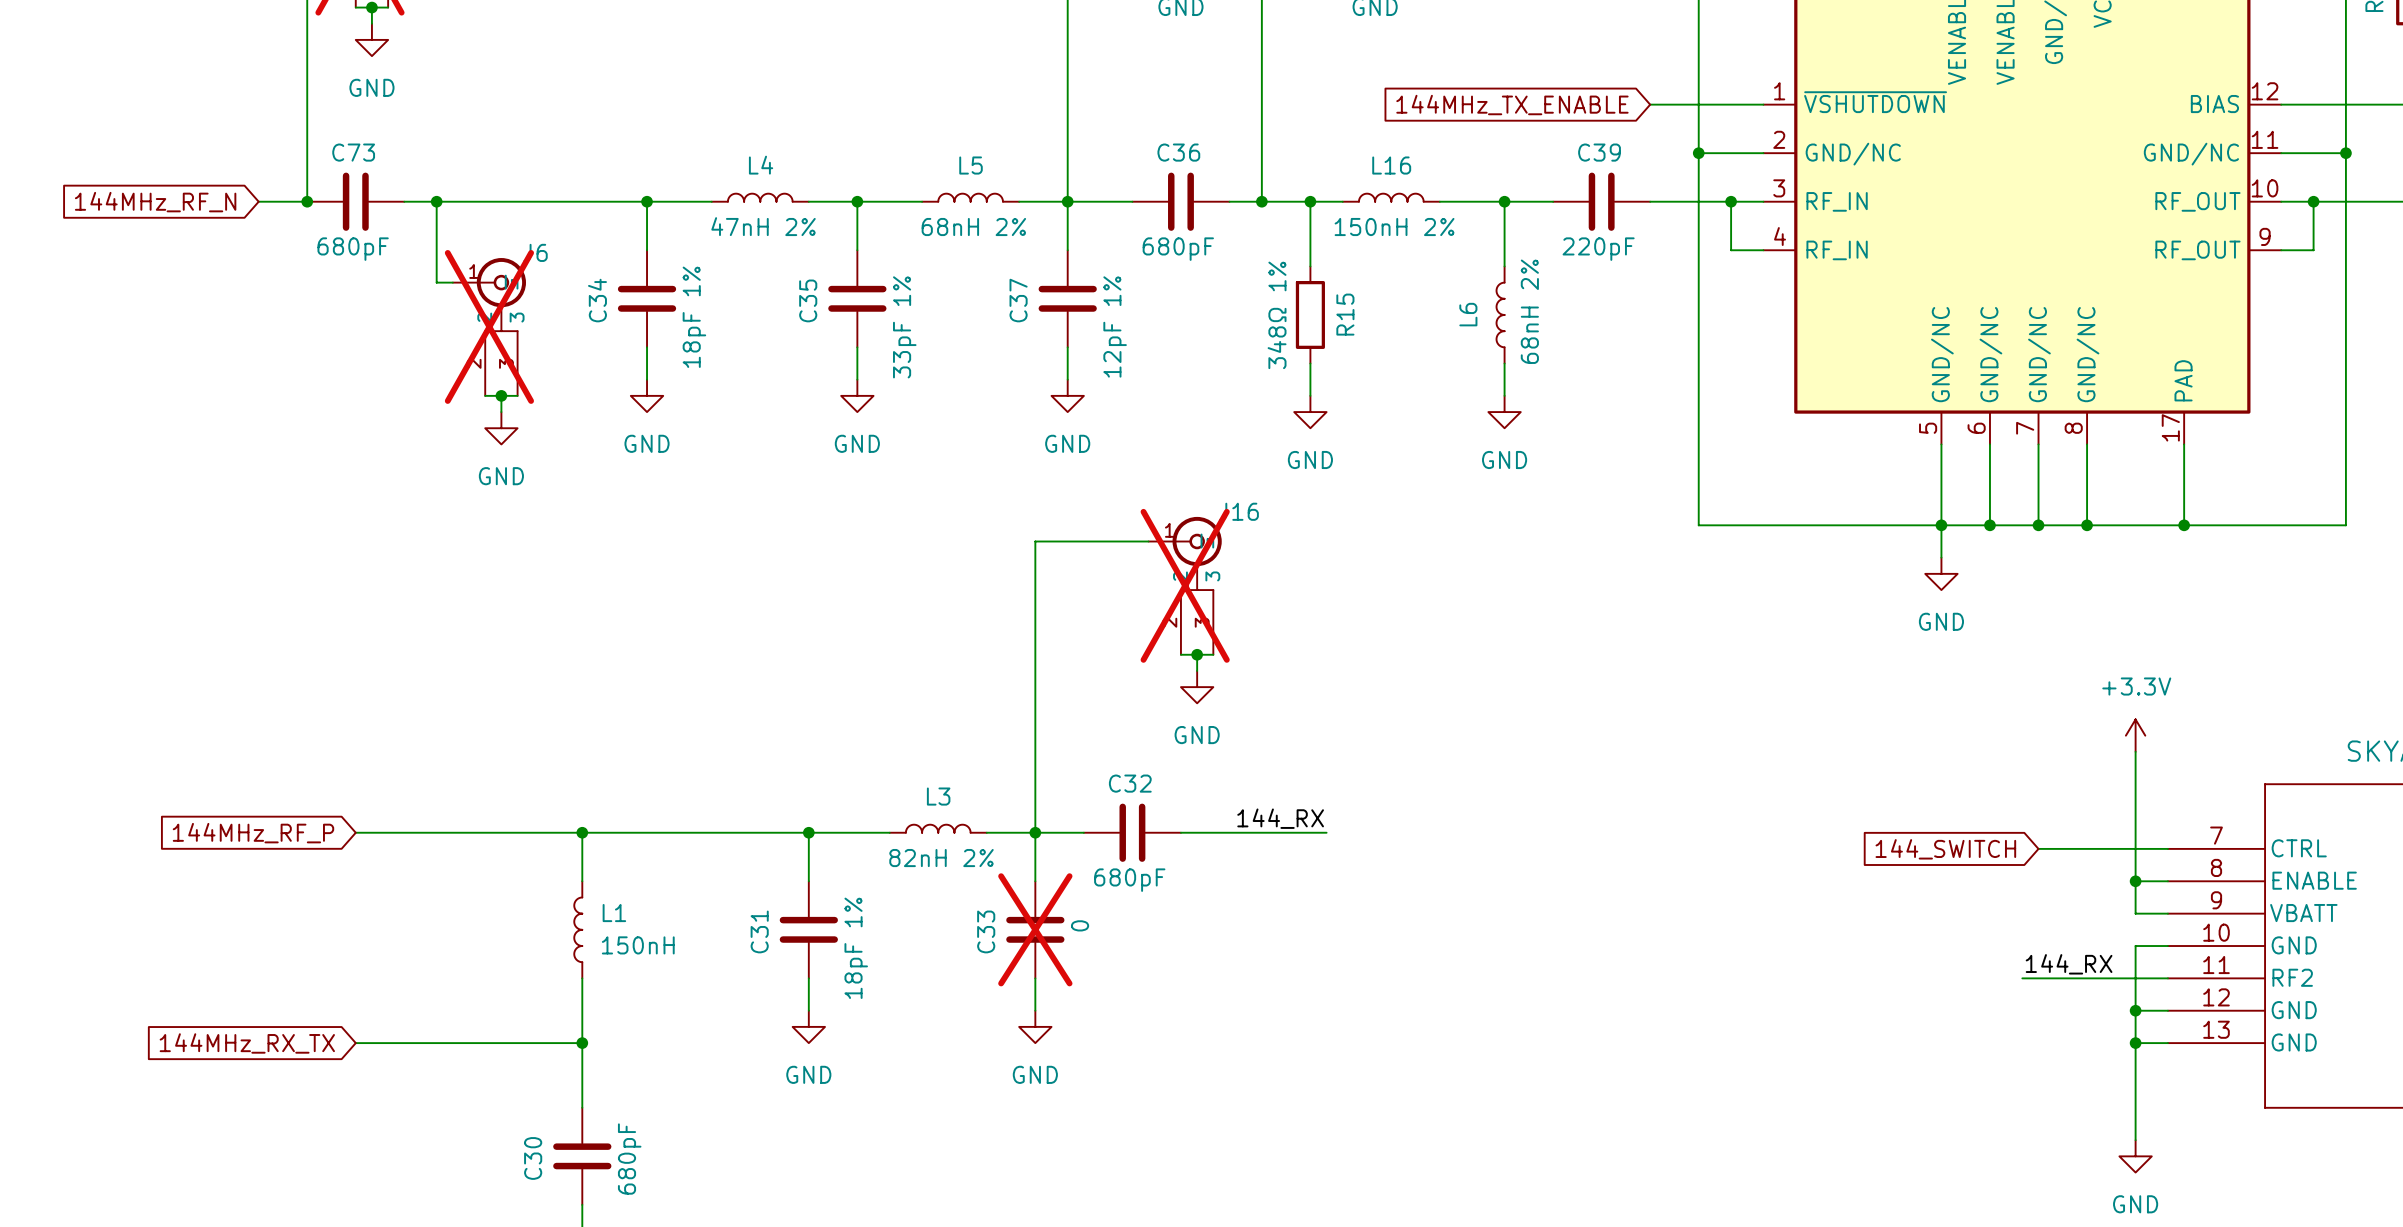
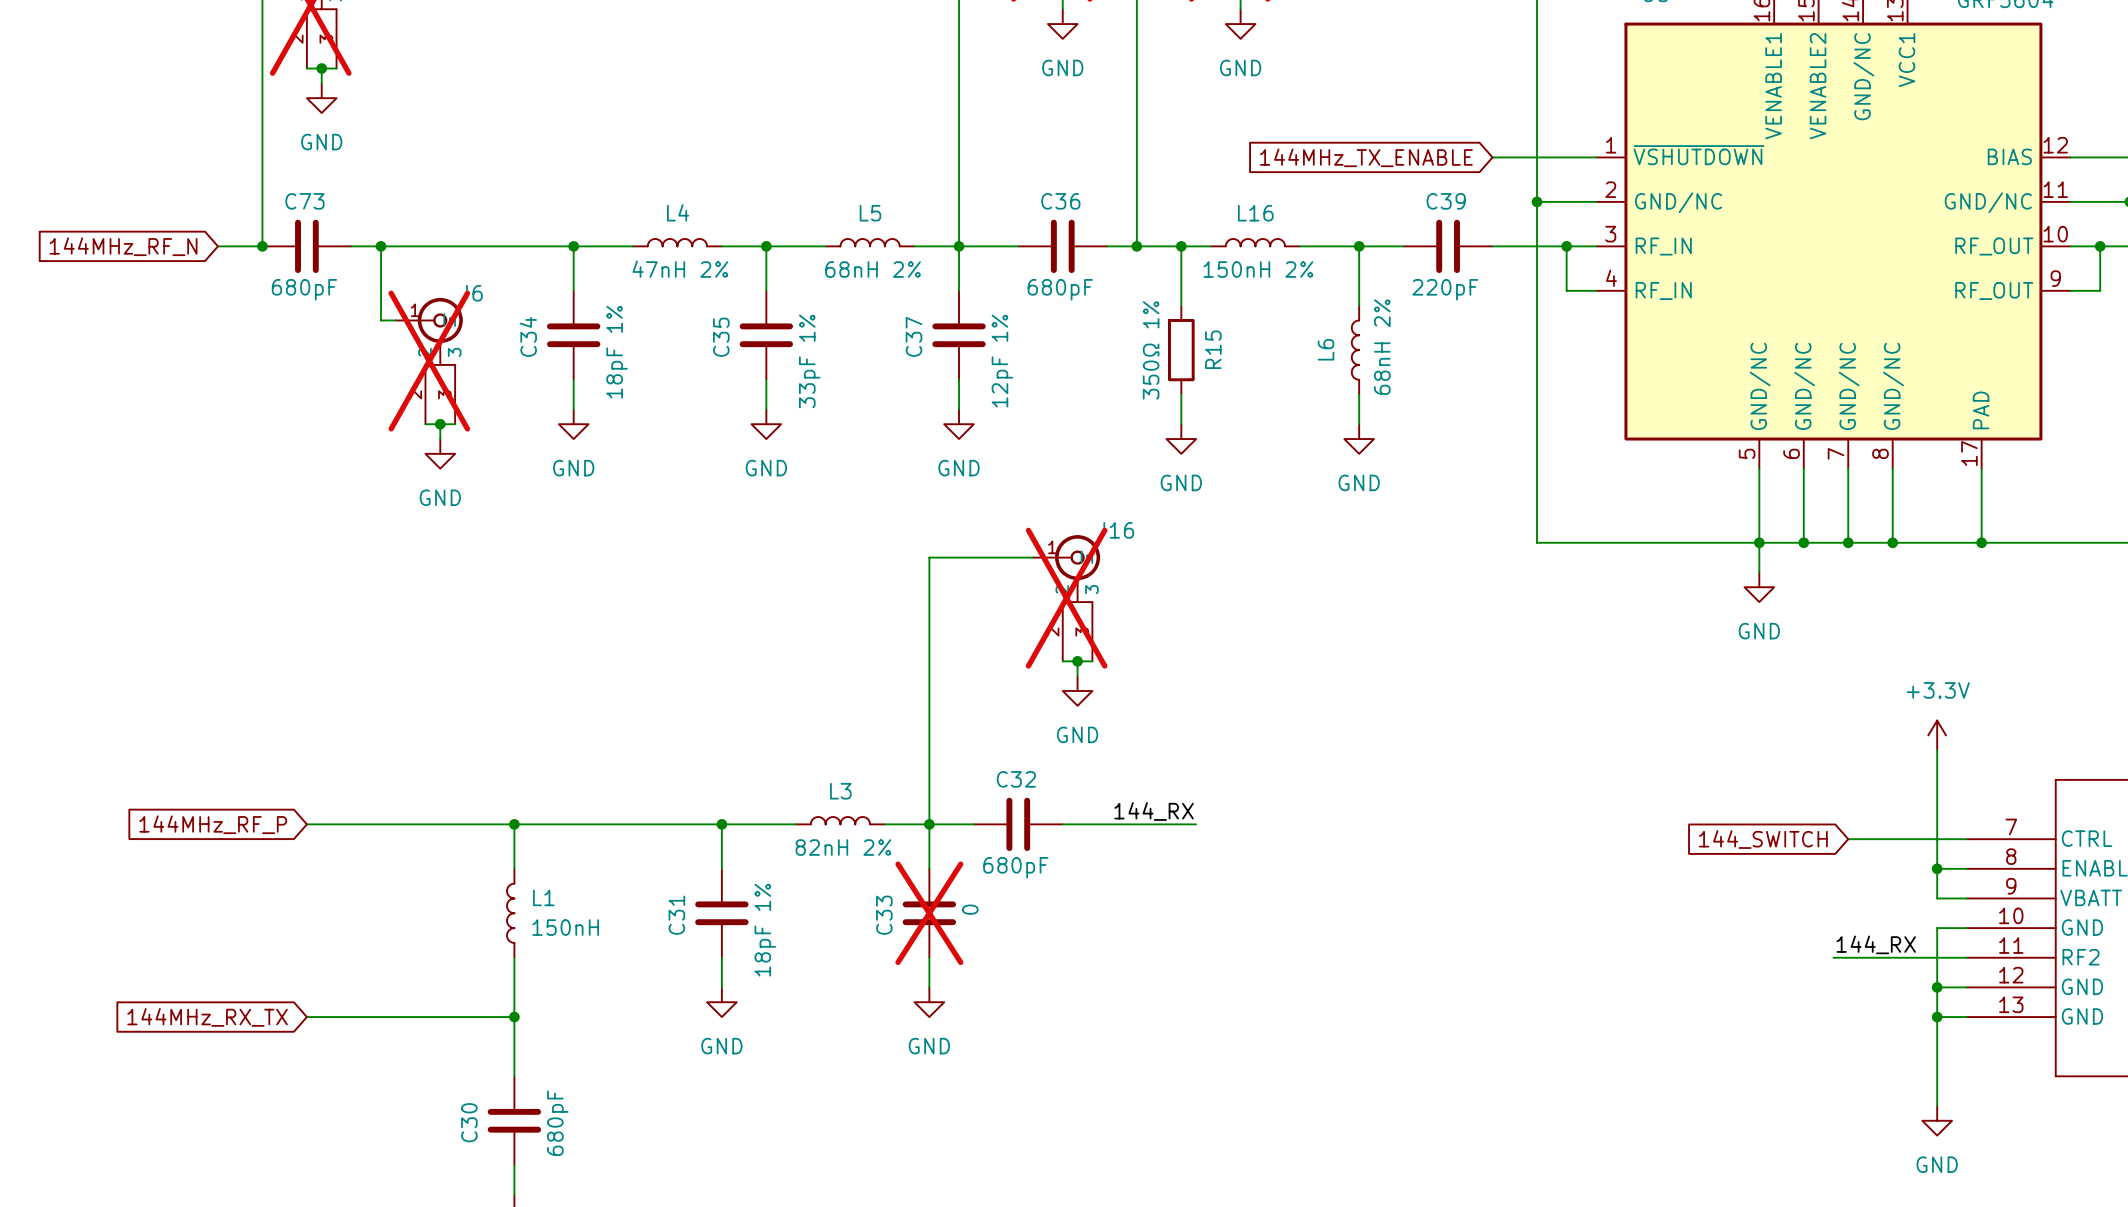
R15 value: 348Ω 1% (1277, 315) -> 350Ω 1% (1151, 350)

